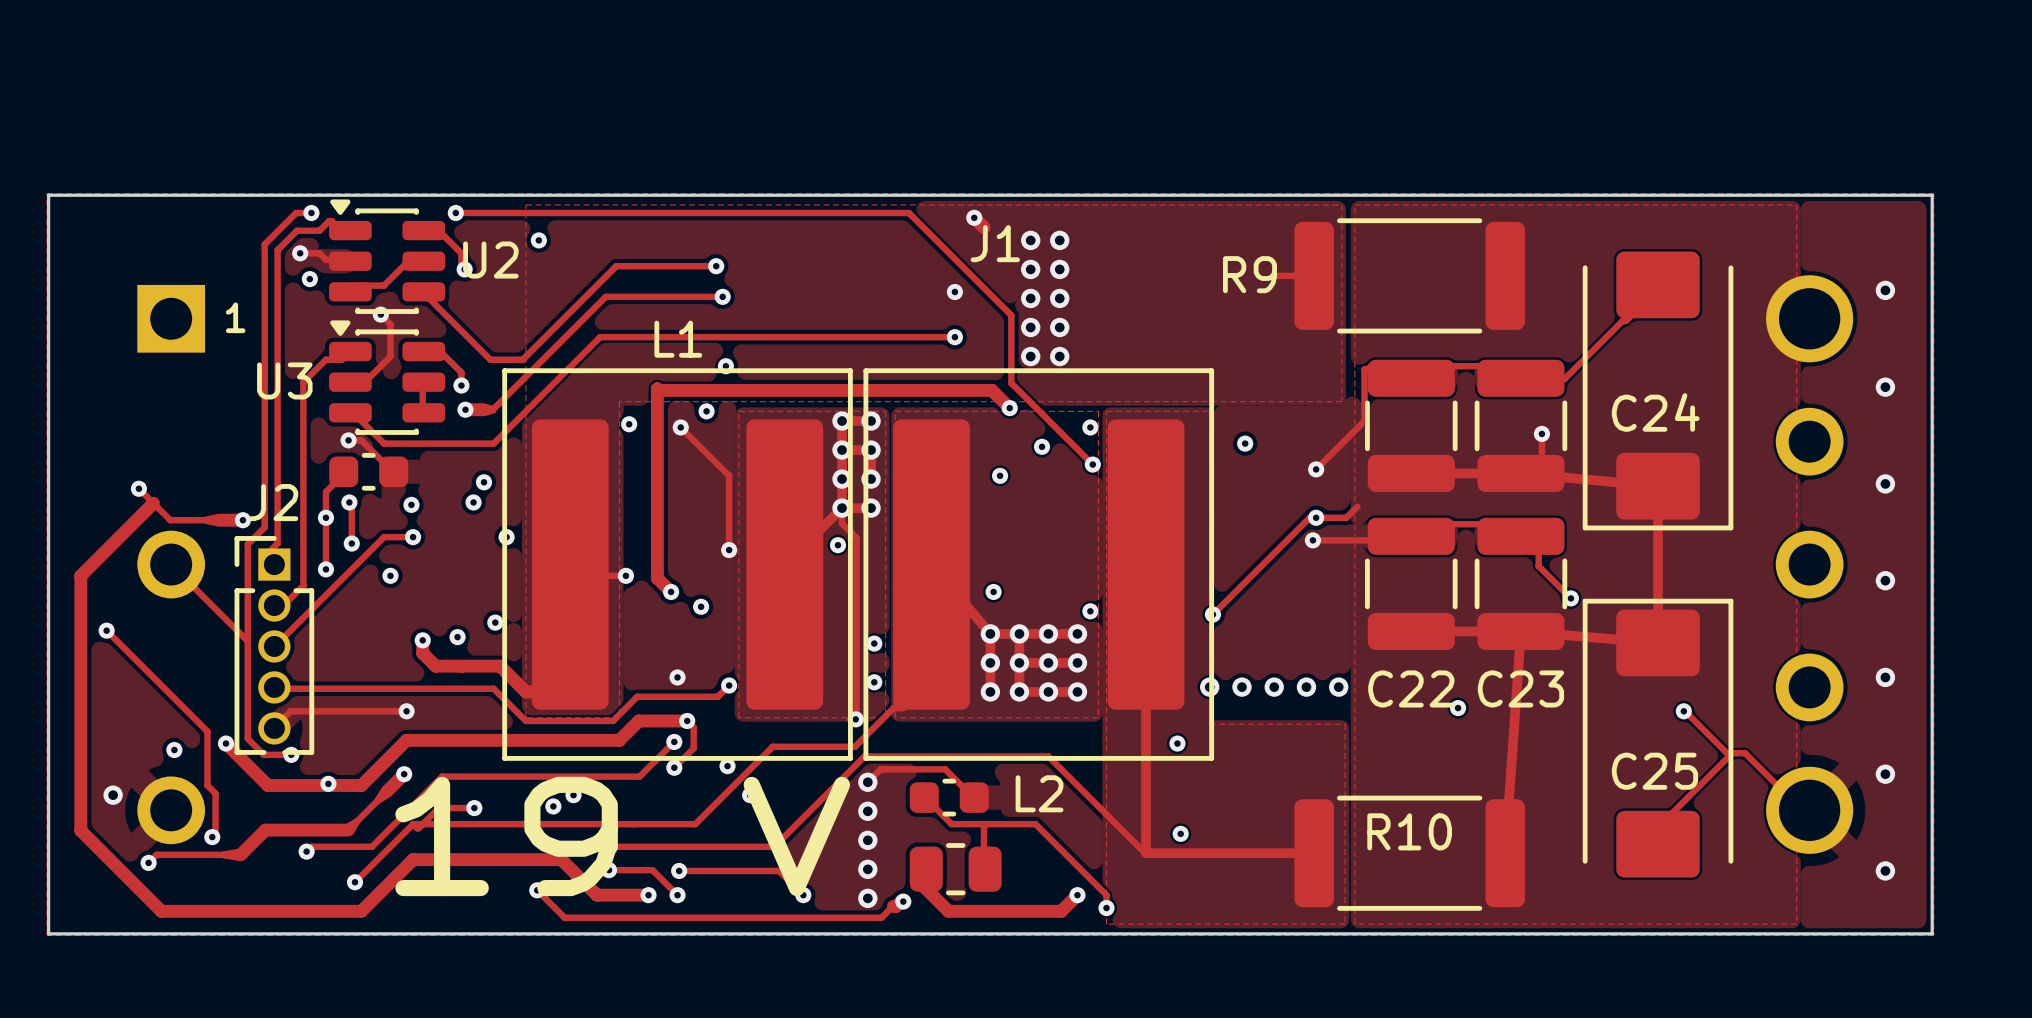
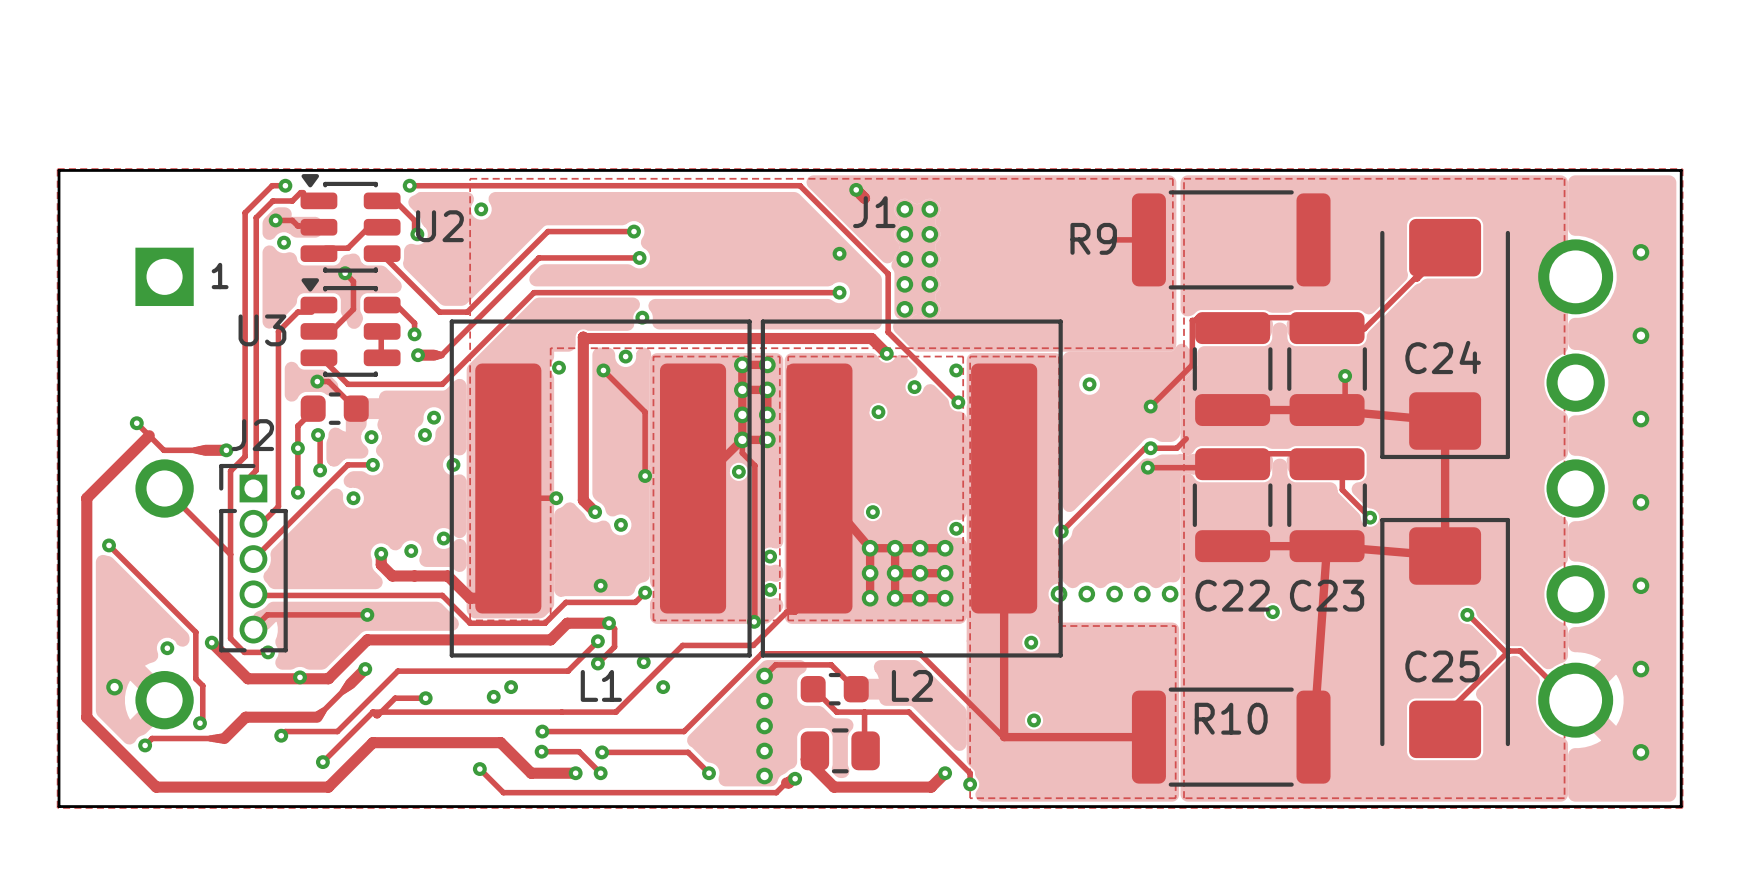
L1 name position: L1 (678, 339) -> L1 (601, 685)
text: 19 V (622, 836) -> none

